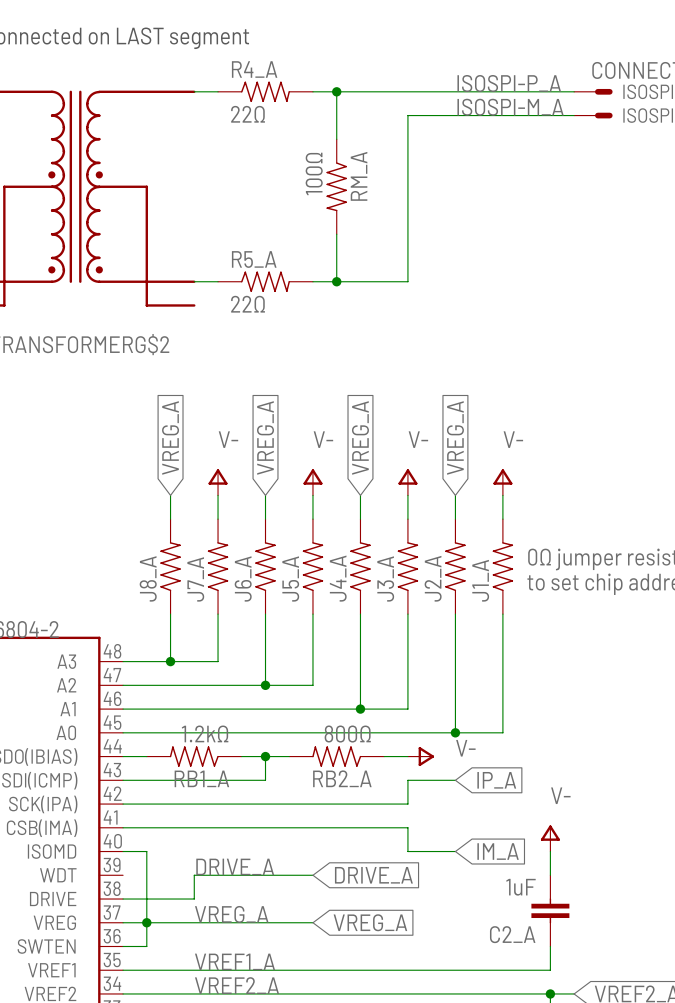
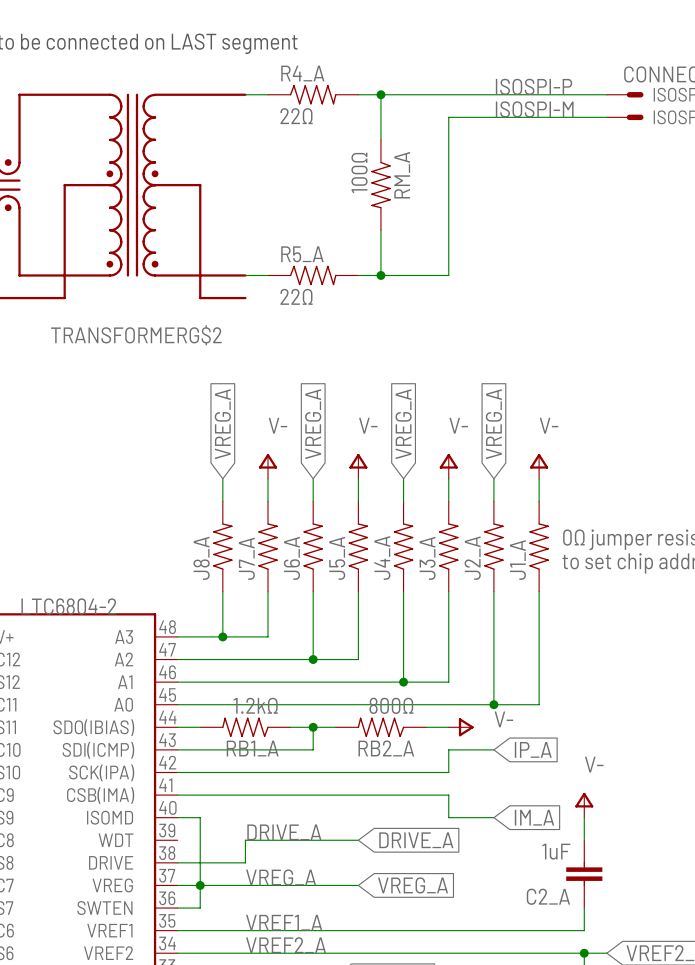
label: ISOSPI-P_A (509, 83) -> ISOSPI-P (534, 86)
label: ISOSPI-M_A (510, 107) -> ISOSPI-M (534, 109)

